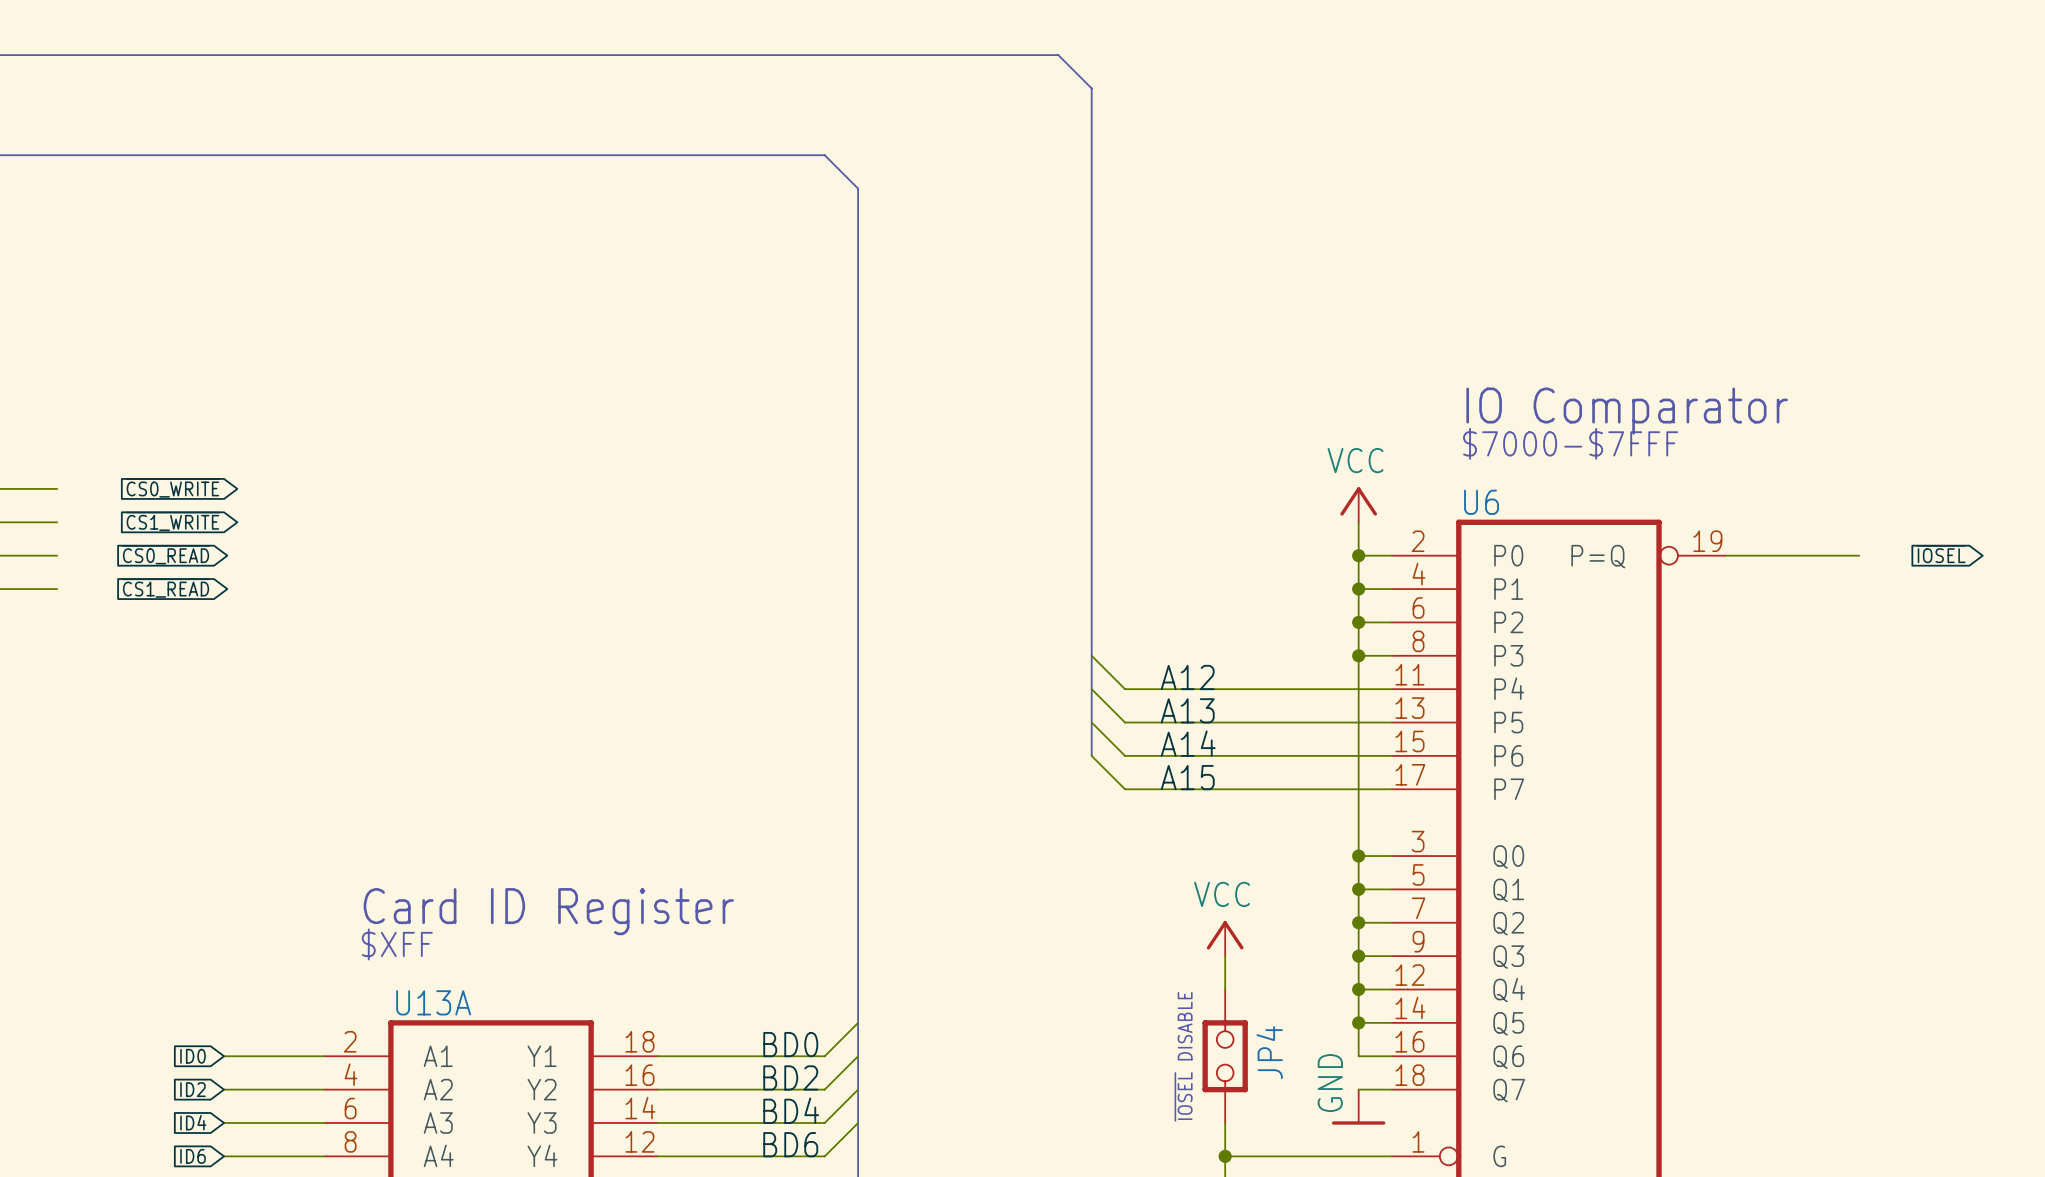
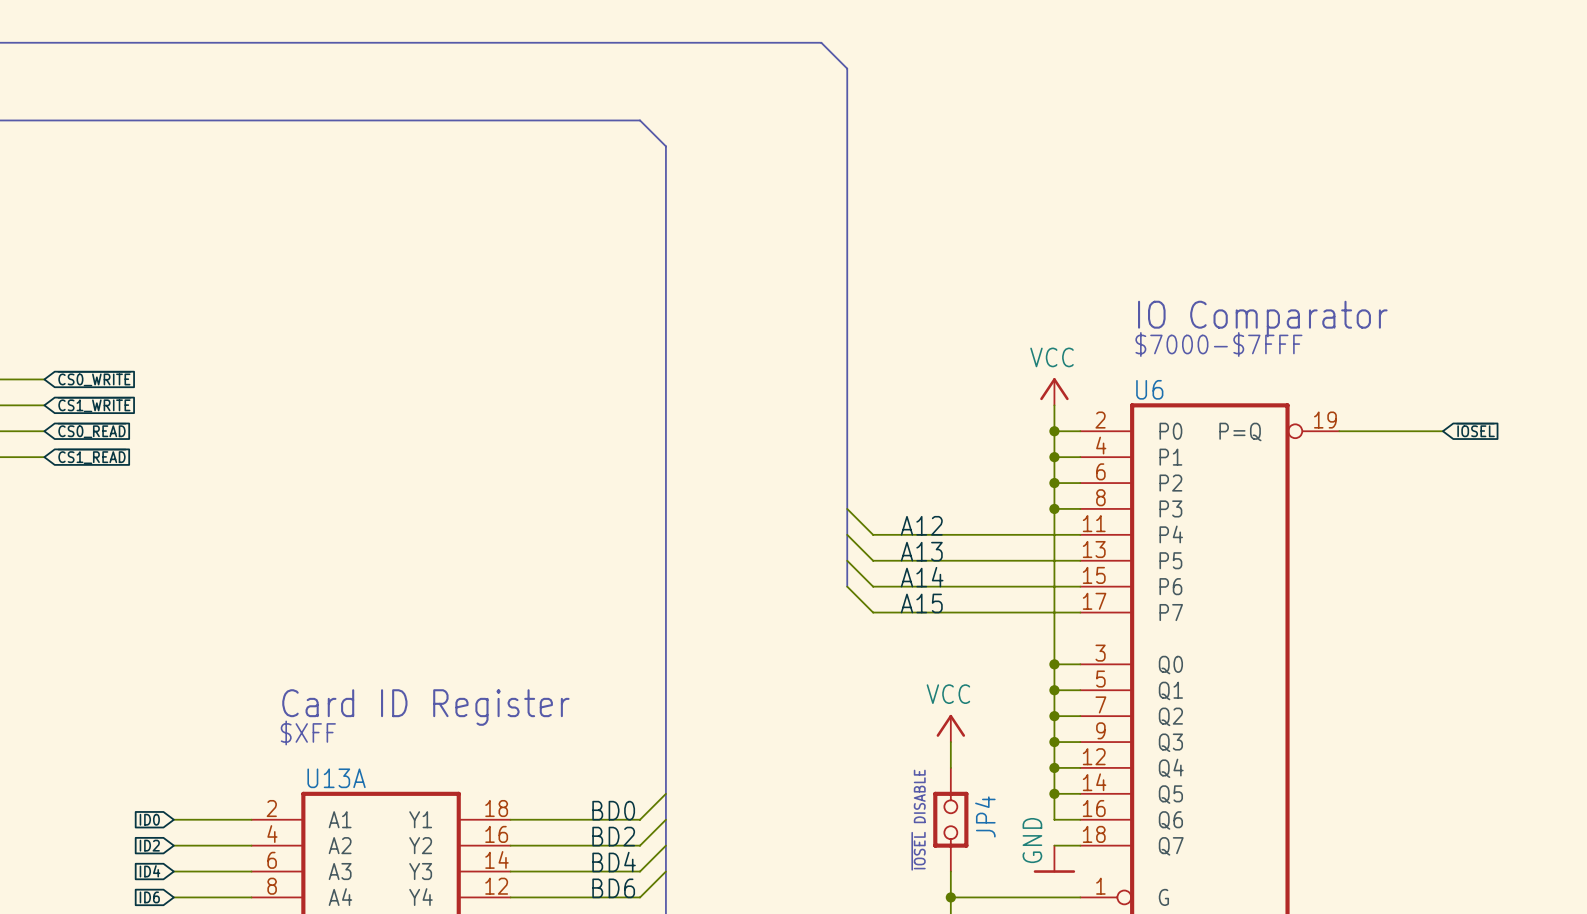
global label rotation: 0° (172, 488) -> 180° (94, 378)
global label rotation: 0° (172, 521) -> 180° (94, 404)
global label rotation: 0° (166, 554) -> 180° (91, 430)
global label rotation: 0° (1940, 554) -> 180° (1475, 430)
global label rotation: 0° (166, 588) -> 180° (91, 456)

